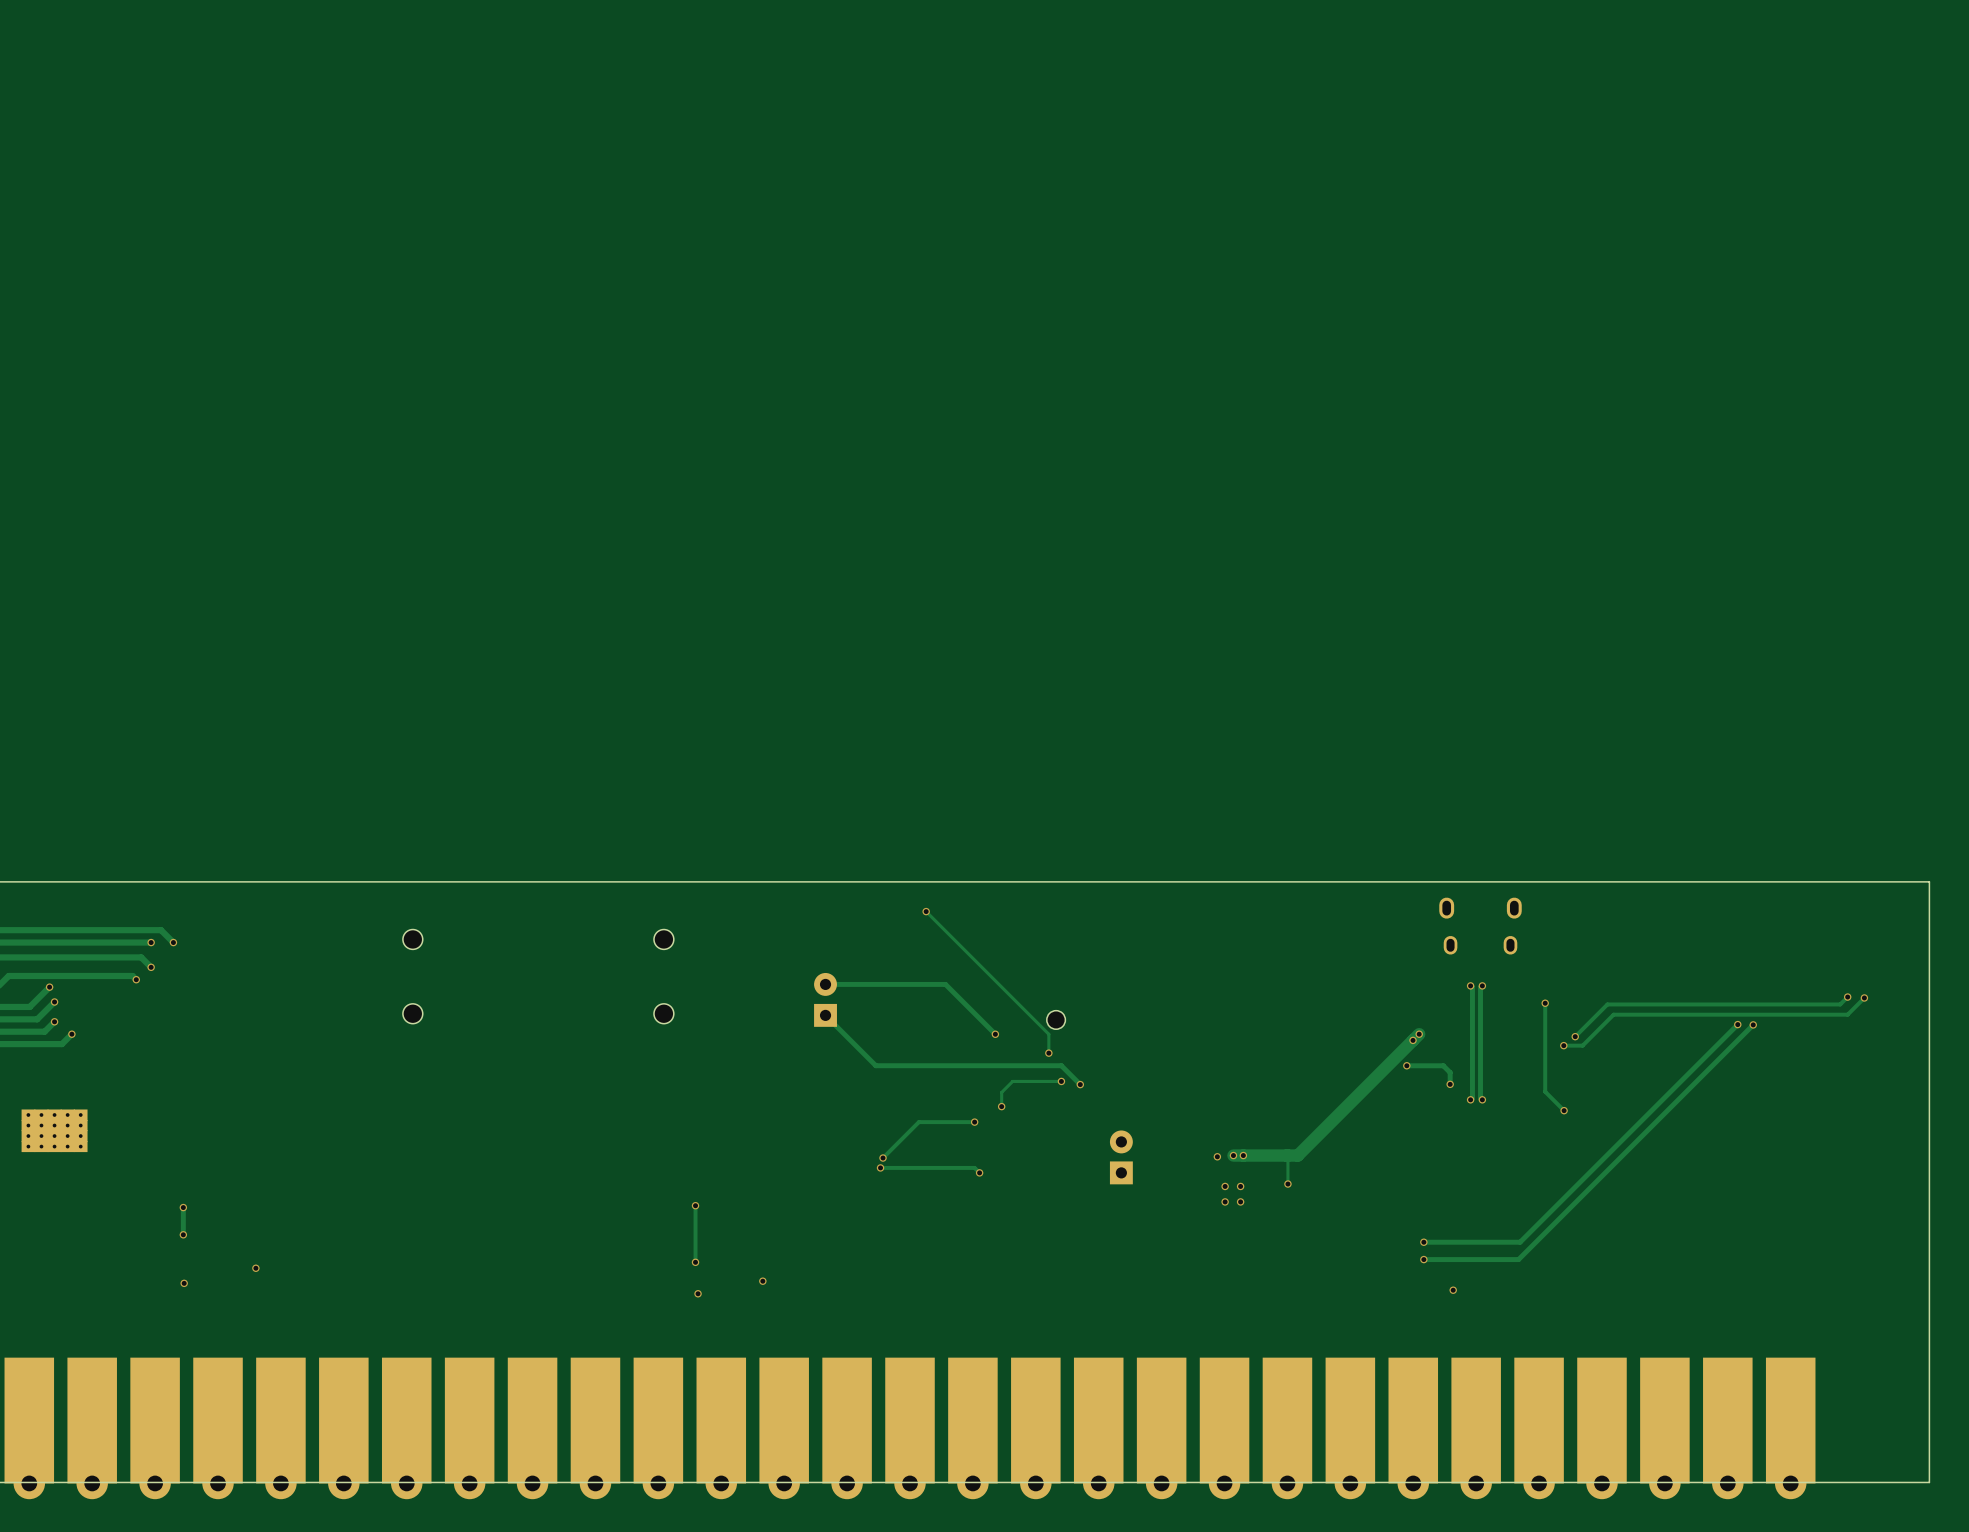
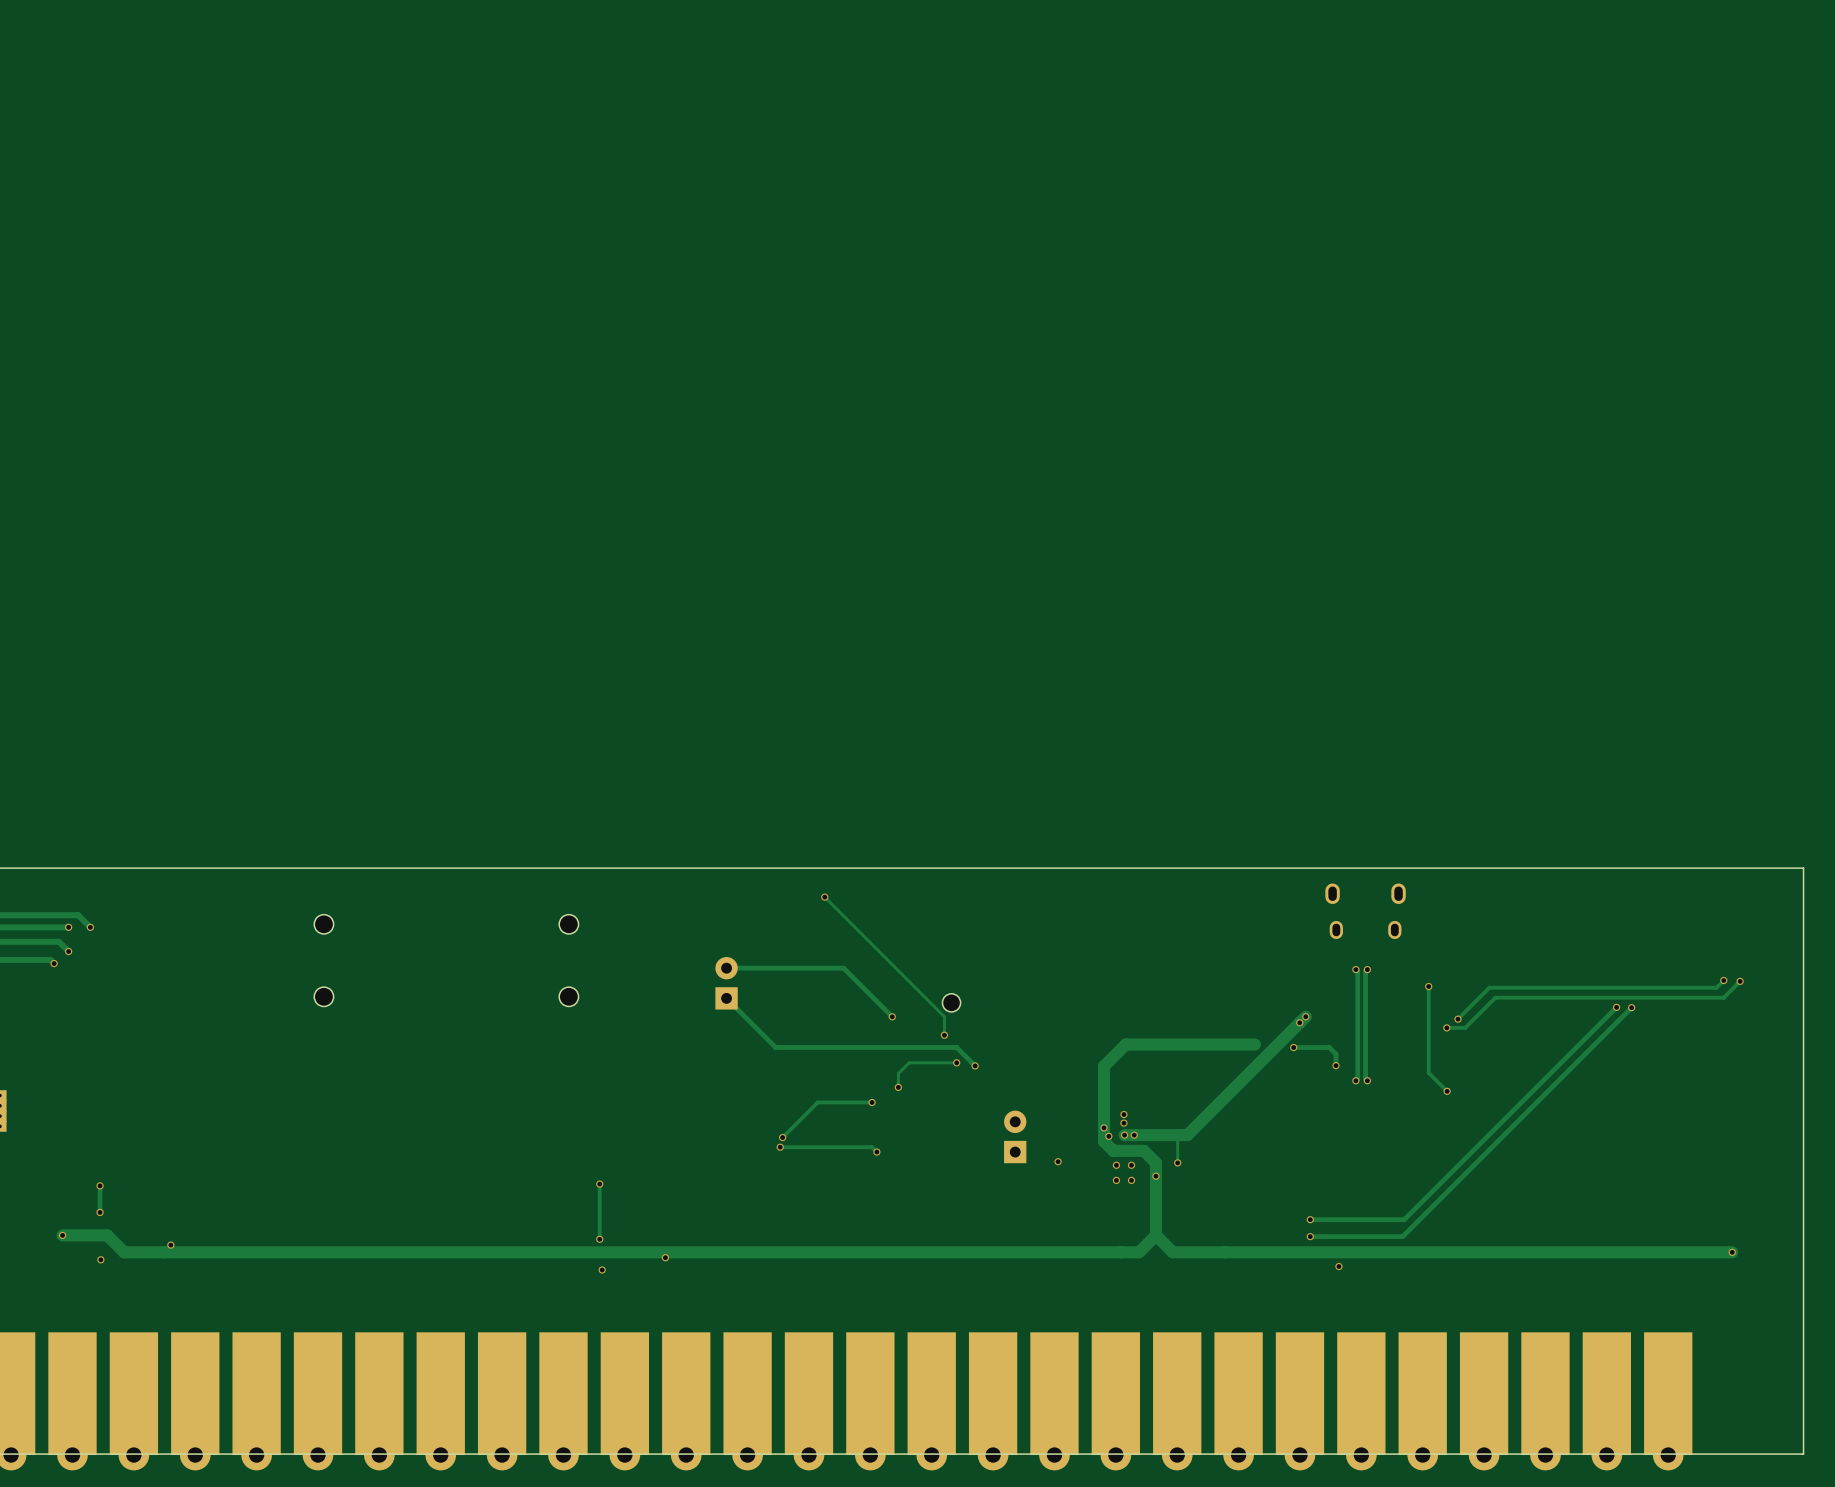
track: none -> (1255, 1044) (1125, 1044) (1104, 1066) (1104, 1141) (1113, 1150) (1143, 1150) (1155, 1162) (1155, 1235)
via: none -> (1123, 1114)
via: none -> (1123, 1123)
via: none -> (1104, 1127)
via: none -> (1058, 1161)
via: none -> (1155, 1176)
via: none -> (62, 1235)
track: none -> (1155, 1235) (1139, 1252) (124, 1252) (107, 1235) (62, 1235)
track: none -> (1155, 1235) (1172, 1252) (1732, 1252)
via: none -> (1732, 1252)

